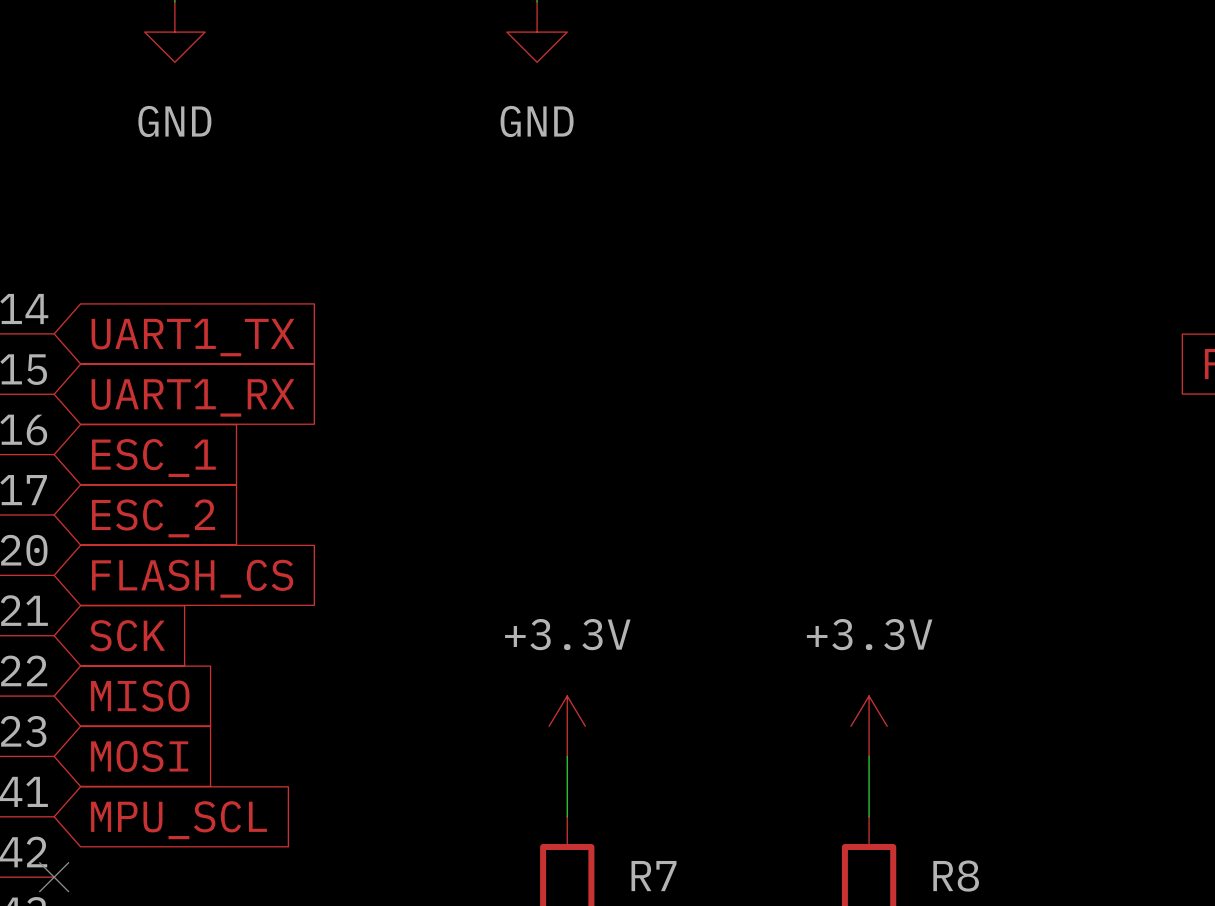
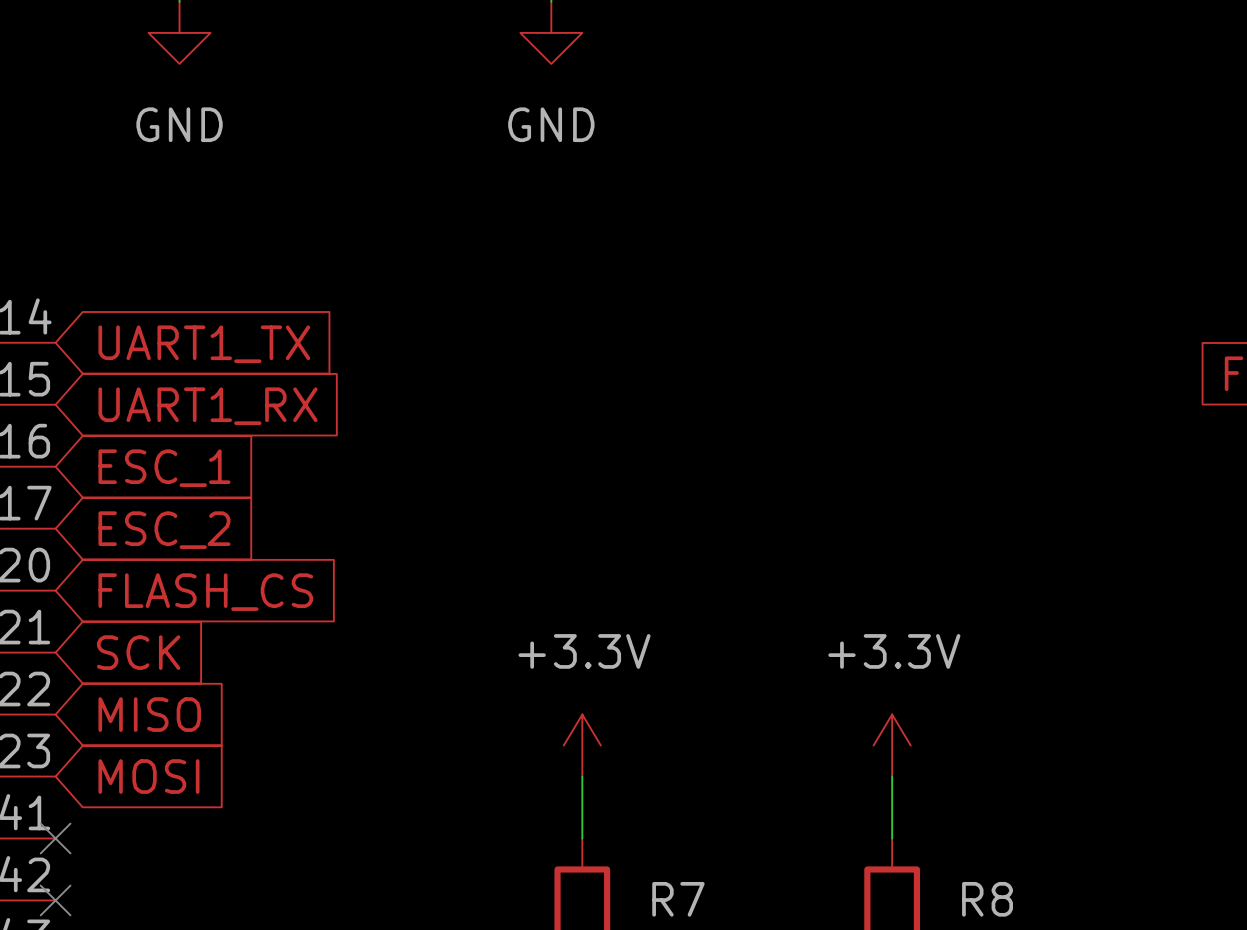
no-connect mark: none -> (55, 838)
global label: MPU_SCL (178, 820) -> none

